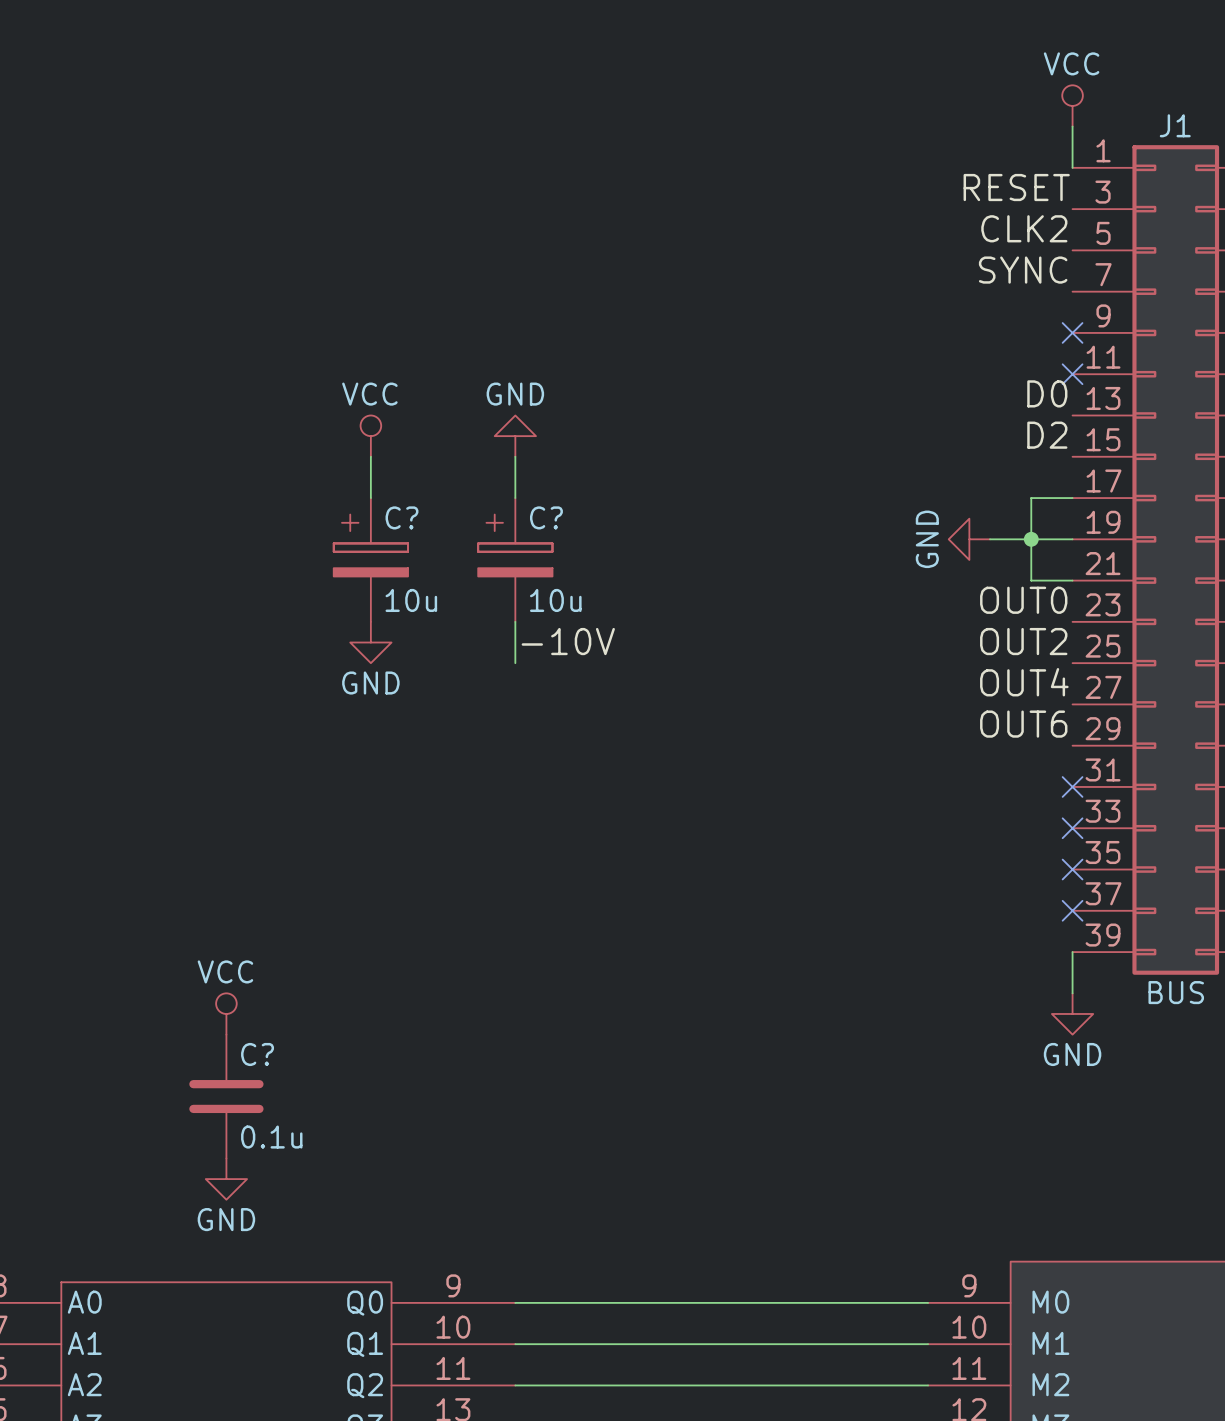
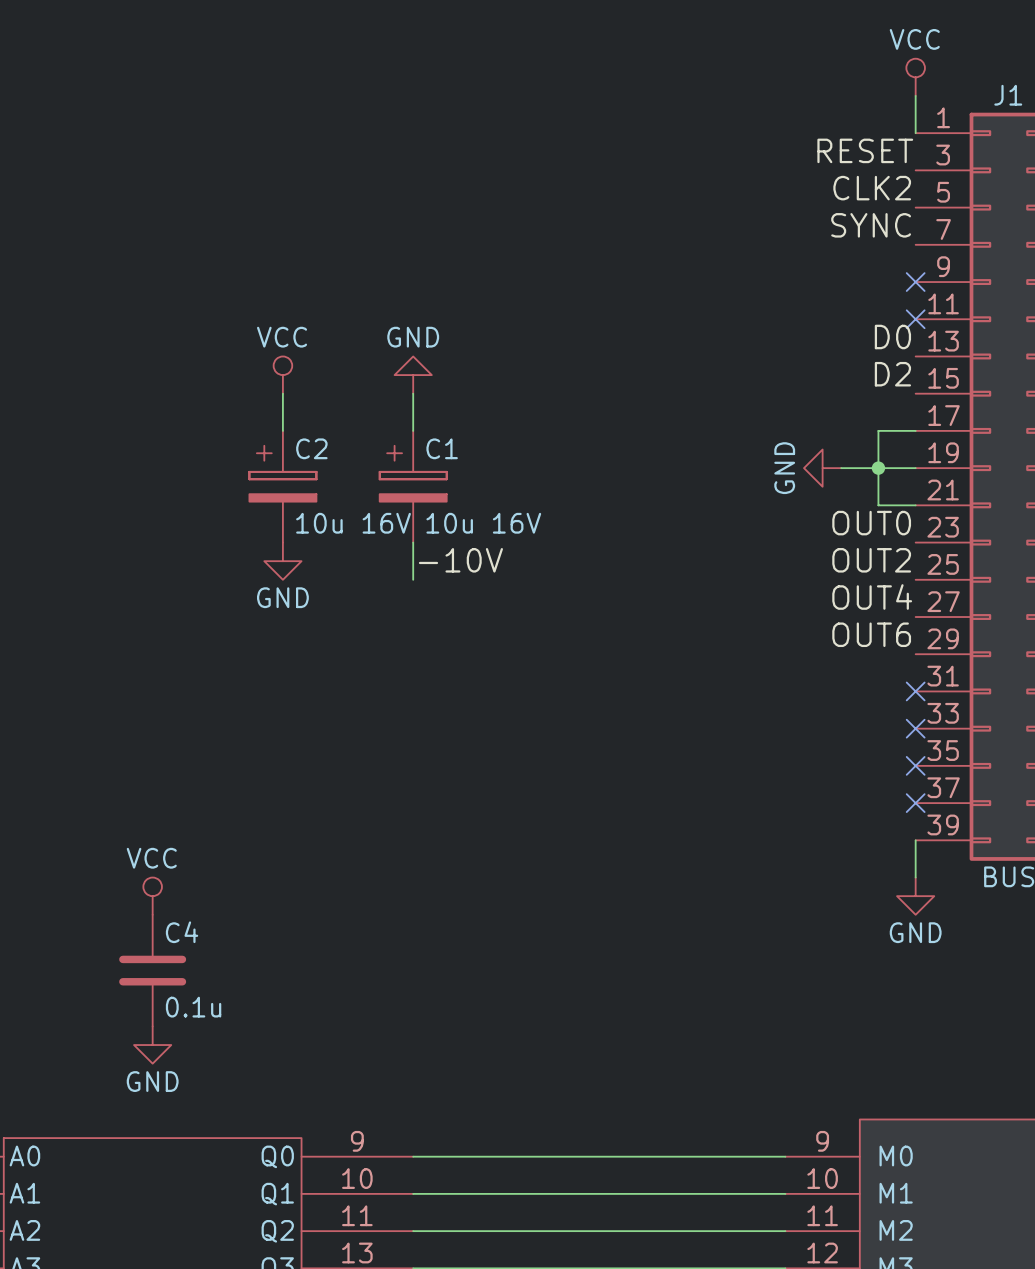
C? name: C? (401, 517) -> C2 (311, 448)
C? name: C? (546, 517) -> C1 (442, 448)
C? value: 10u (411, 600) -> 10u 16V (353, 523)
C? value: 10u (555, 600) -> 10u 16V (483, 523)
C? name: C? (257, 1054) -> C4 (182, 932)

